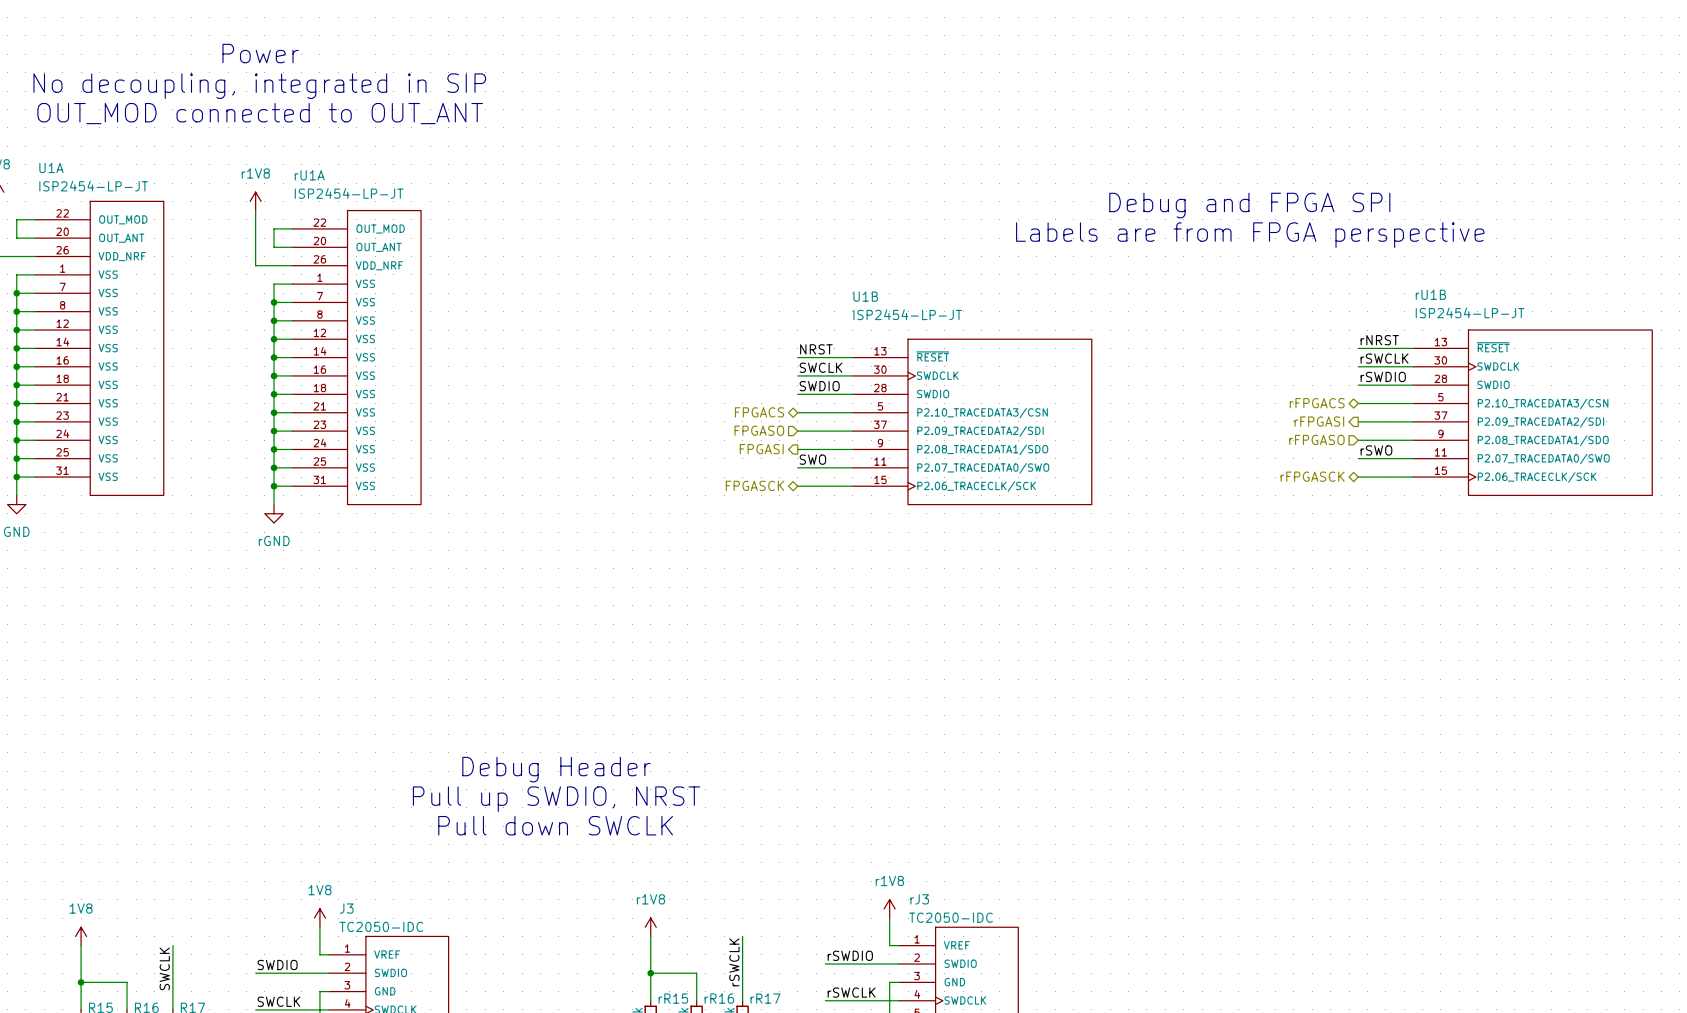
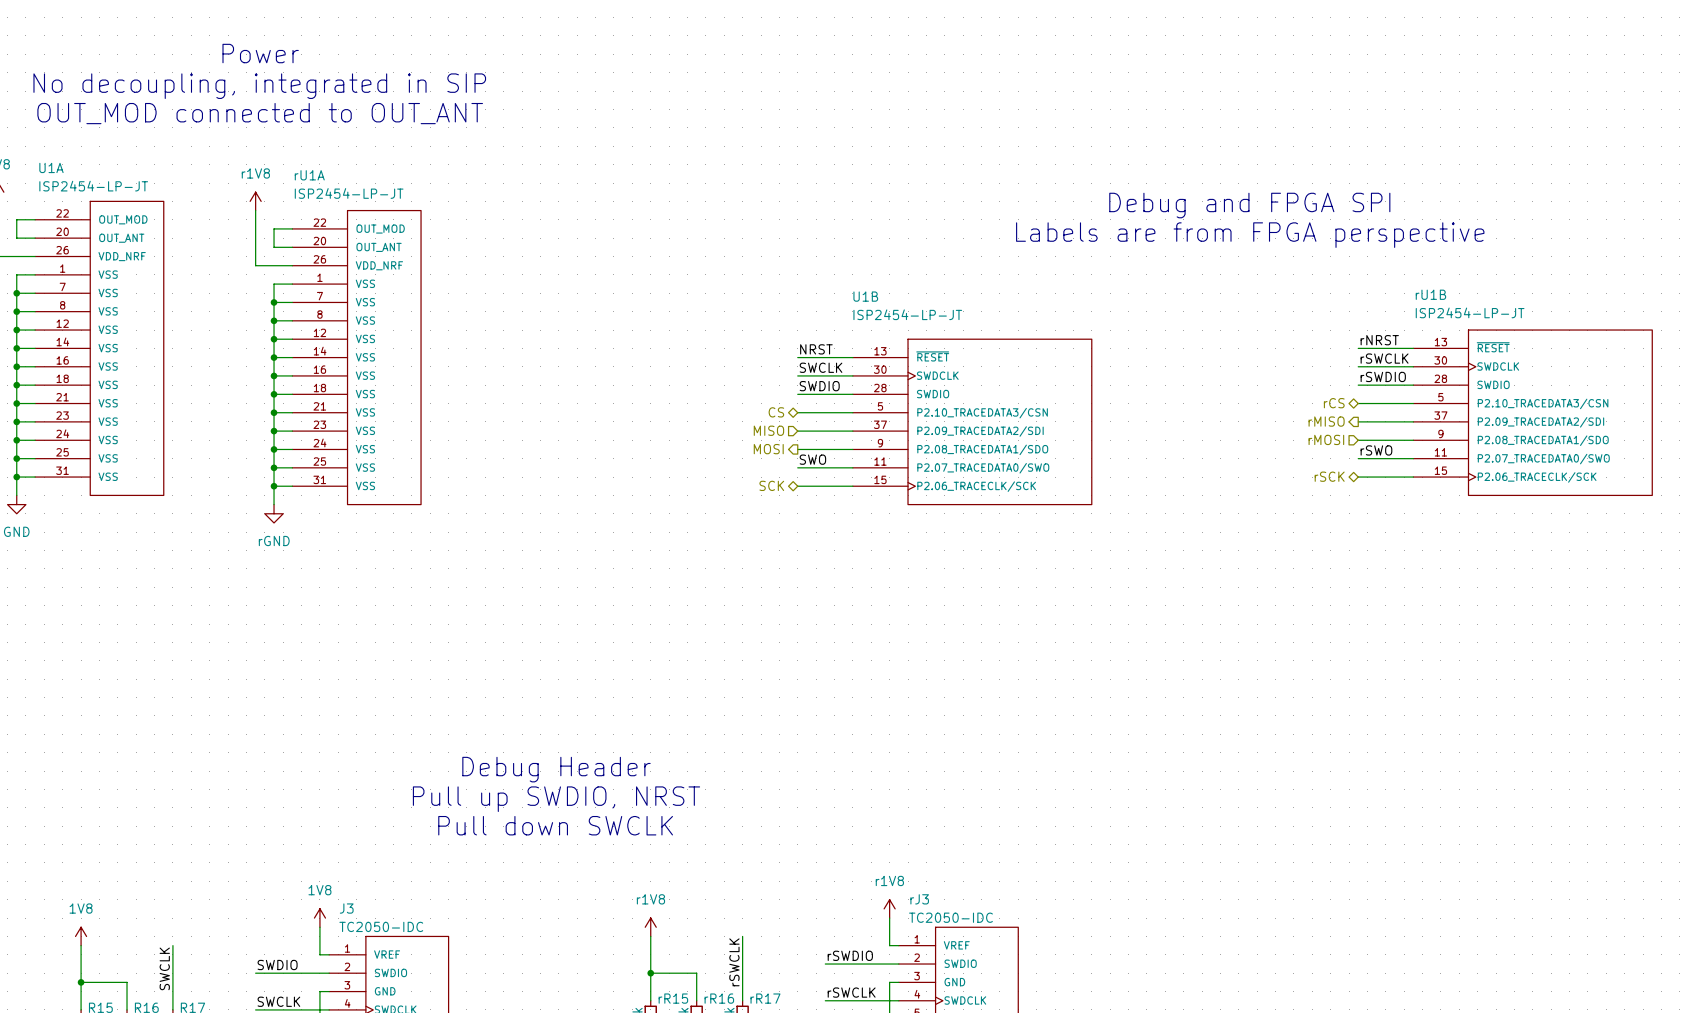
hierarchical label: rFPGACS (1317, 403) -> rCS (1334, 403)
hierarchical label: FPGACS (759, 412) -> CS (776, 412)
hierarchical label: rFPGASI (1319, 421) -> rMISO (1326, 421)
hierarchical label: FPGASO (759, 430) -> MISO (768, 430)
hierarchical label: rFPGASO (1316, 439) -> rMOSI (1326, 439)
hierarchical label: FPGASI (761, 449) -> MOSI (768, 449)
hierarchical label: rFPGASCK (1312, 476) -> rSCK (1329, 476)
hierarchical label: FPGASCK (754, 485) -> SCK (771, 485)

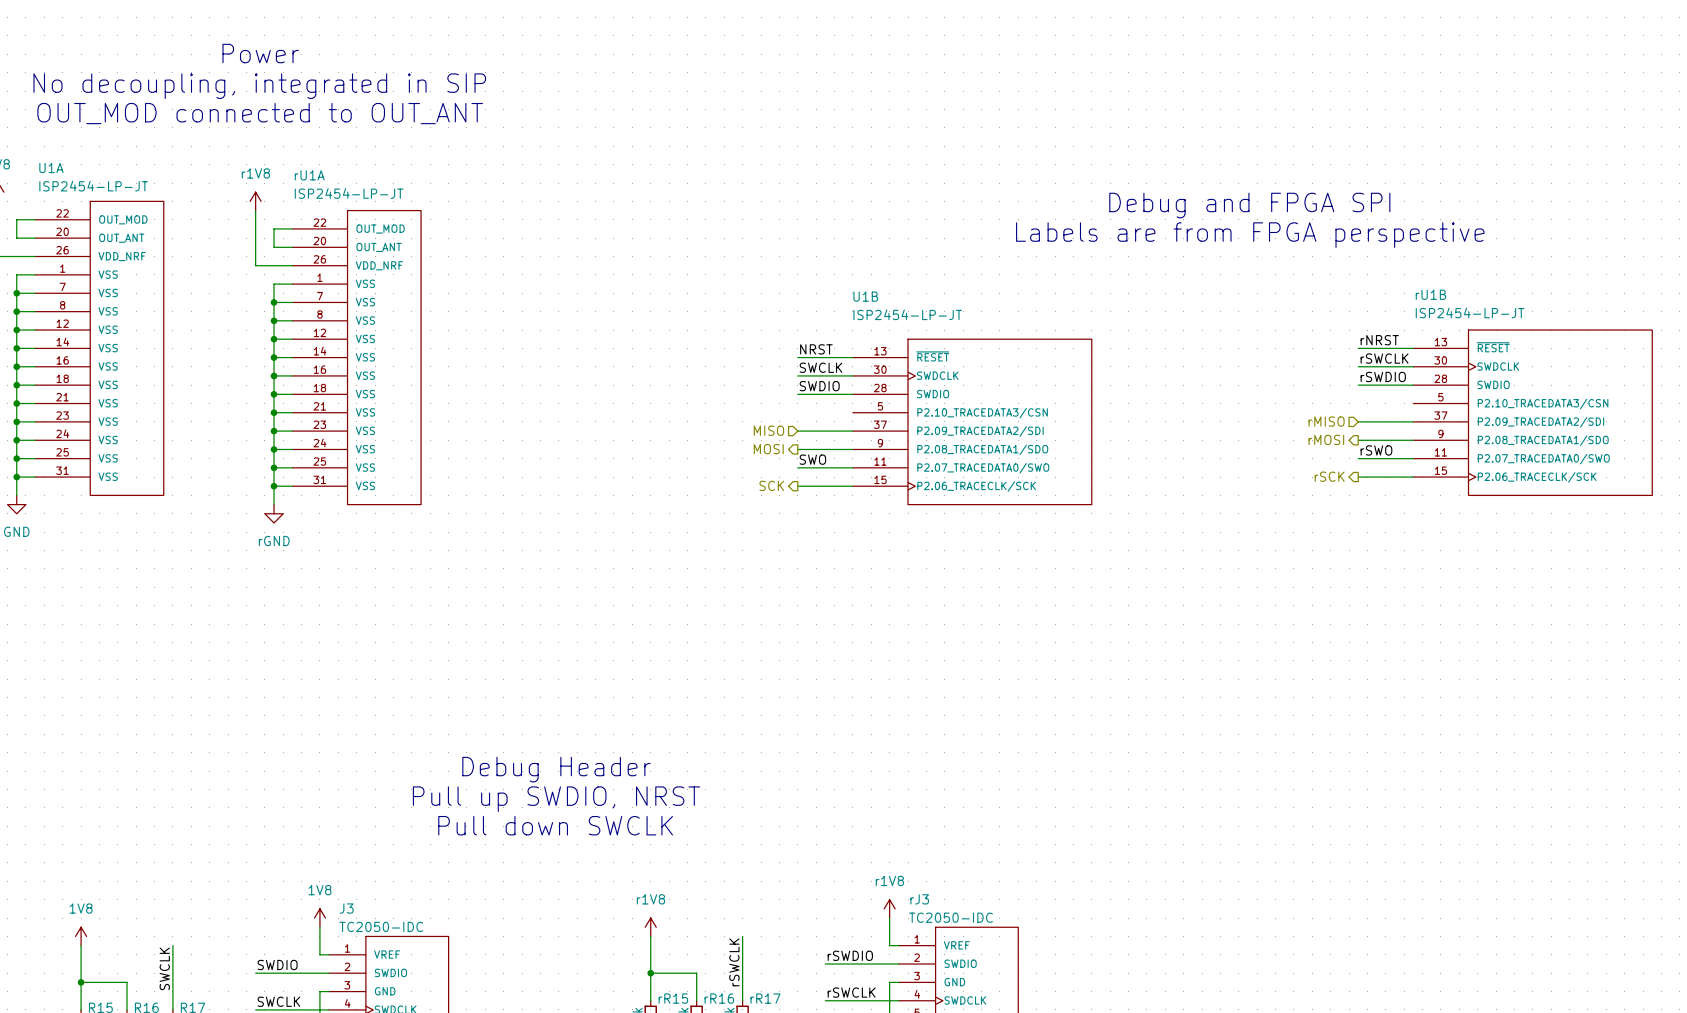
hierarchical label: rCS (1334, 403) -> none
wire: (1358, 403) (1413, 403) -> none
hierarchical label: CS (776, 412) -> none
wire: (797, 412) (852, 412) -> none
hierarchical label shape: output (1326, 421) -> input (1326, 421)
hierarchical label shape: input (1326, 439) -> output (1326, 439)
hierarchical label shape: bidirectional (1329, 476) -> output (1329, 476)
hierarchical label shape: bidirectional (771, 485) -> output (771, 485)

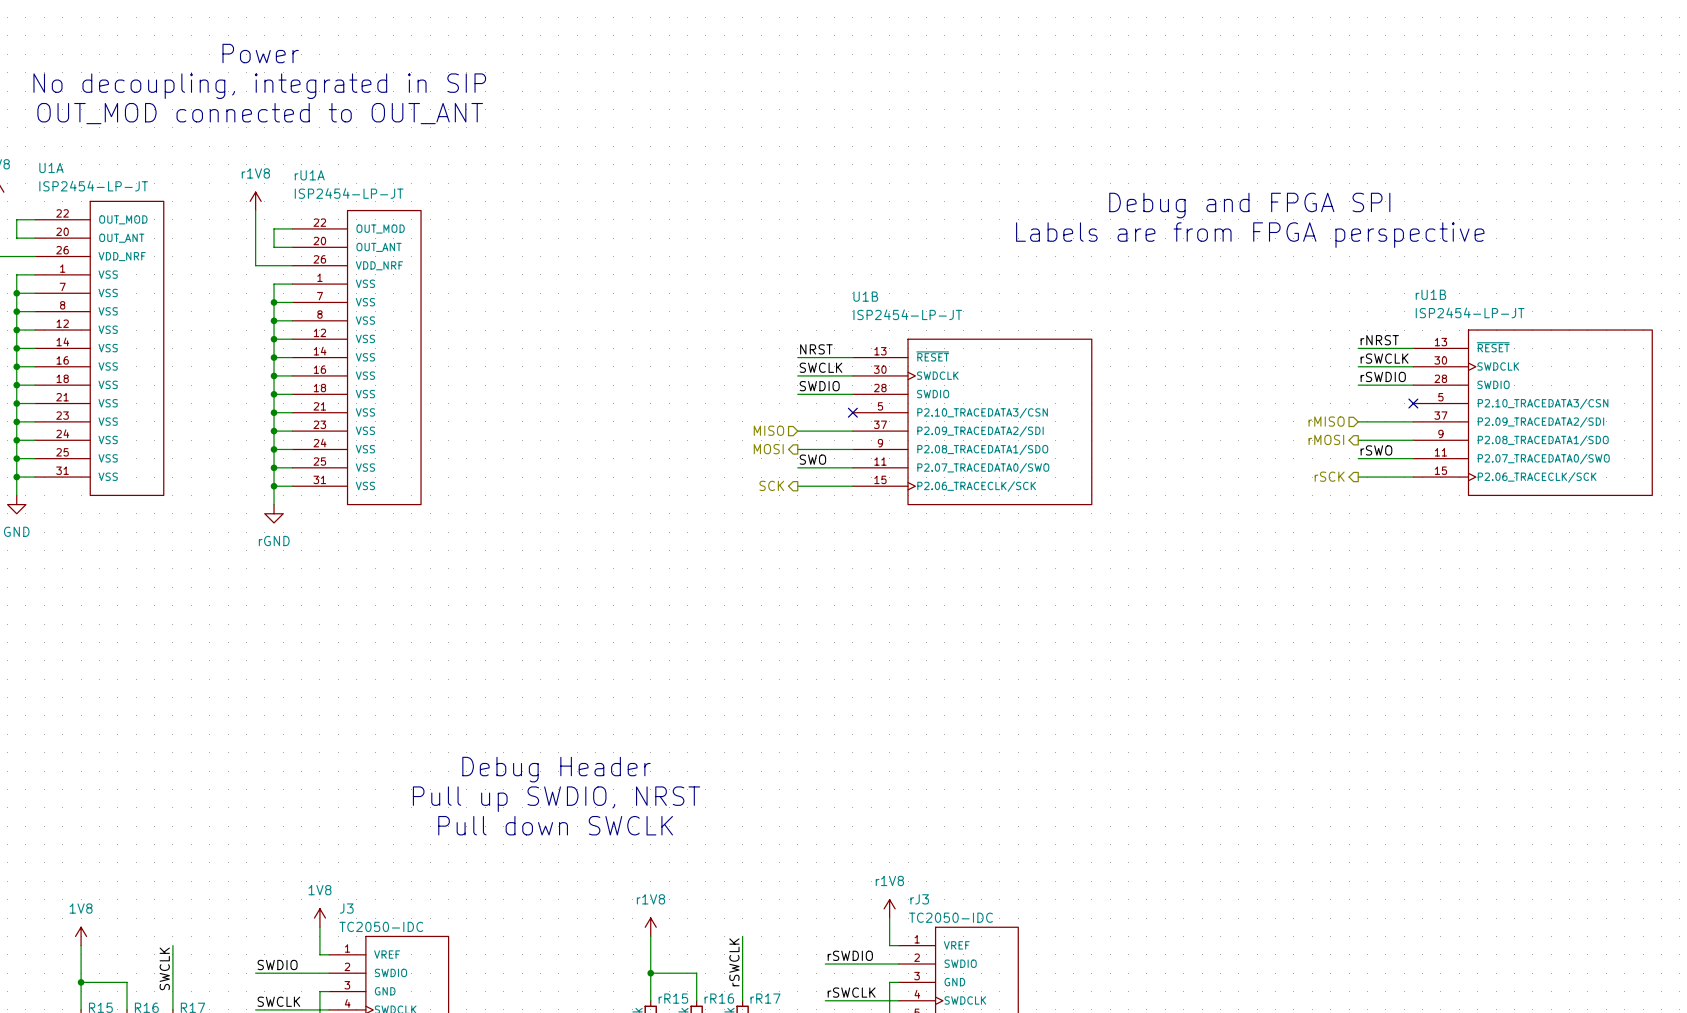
no-connect mark: none -> (1413, 403)
no-connect mark: none -> (852, 412)

